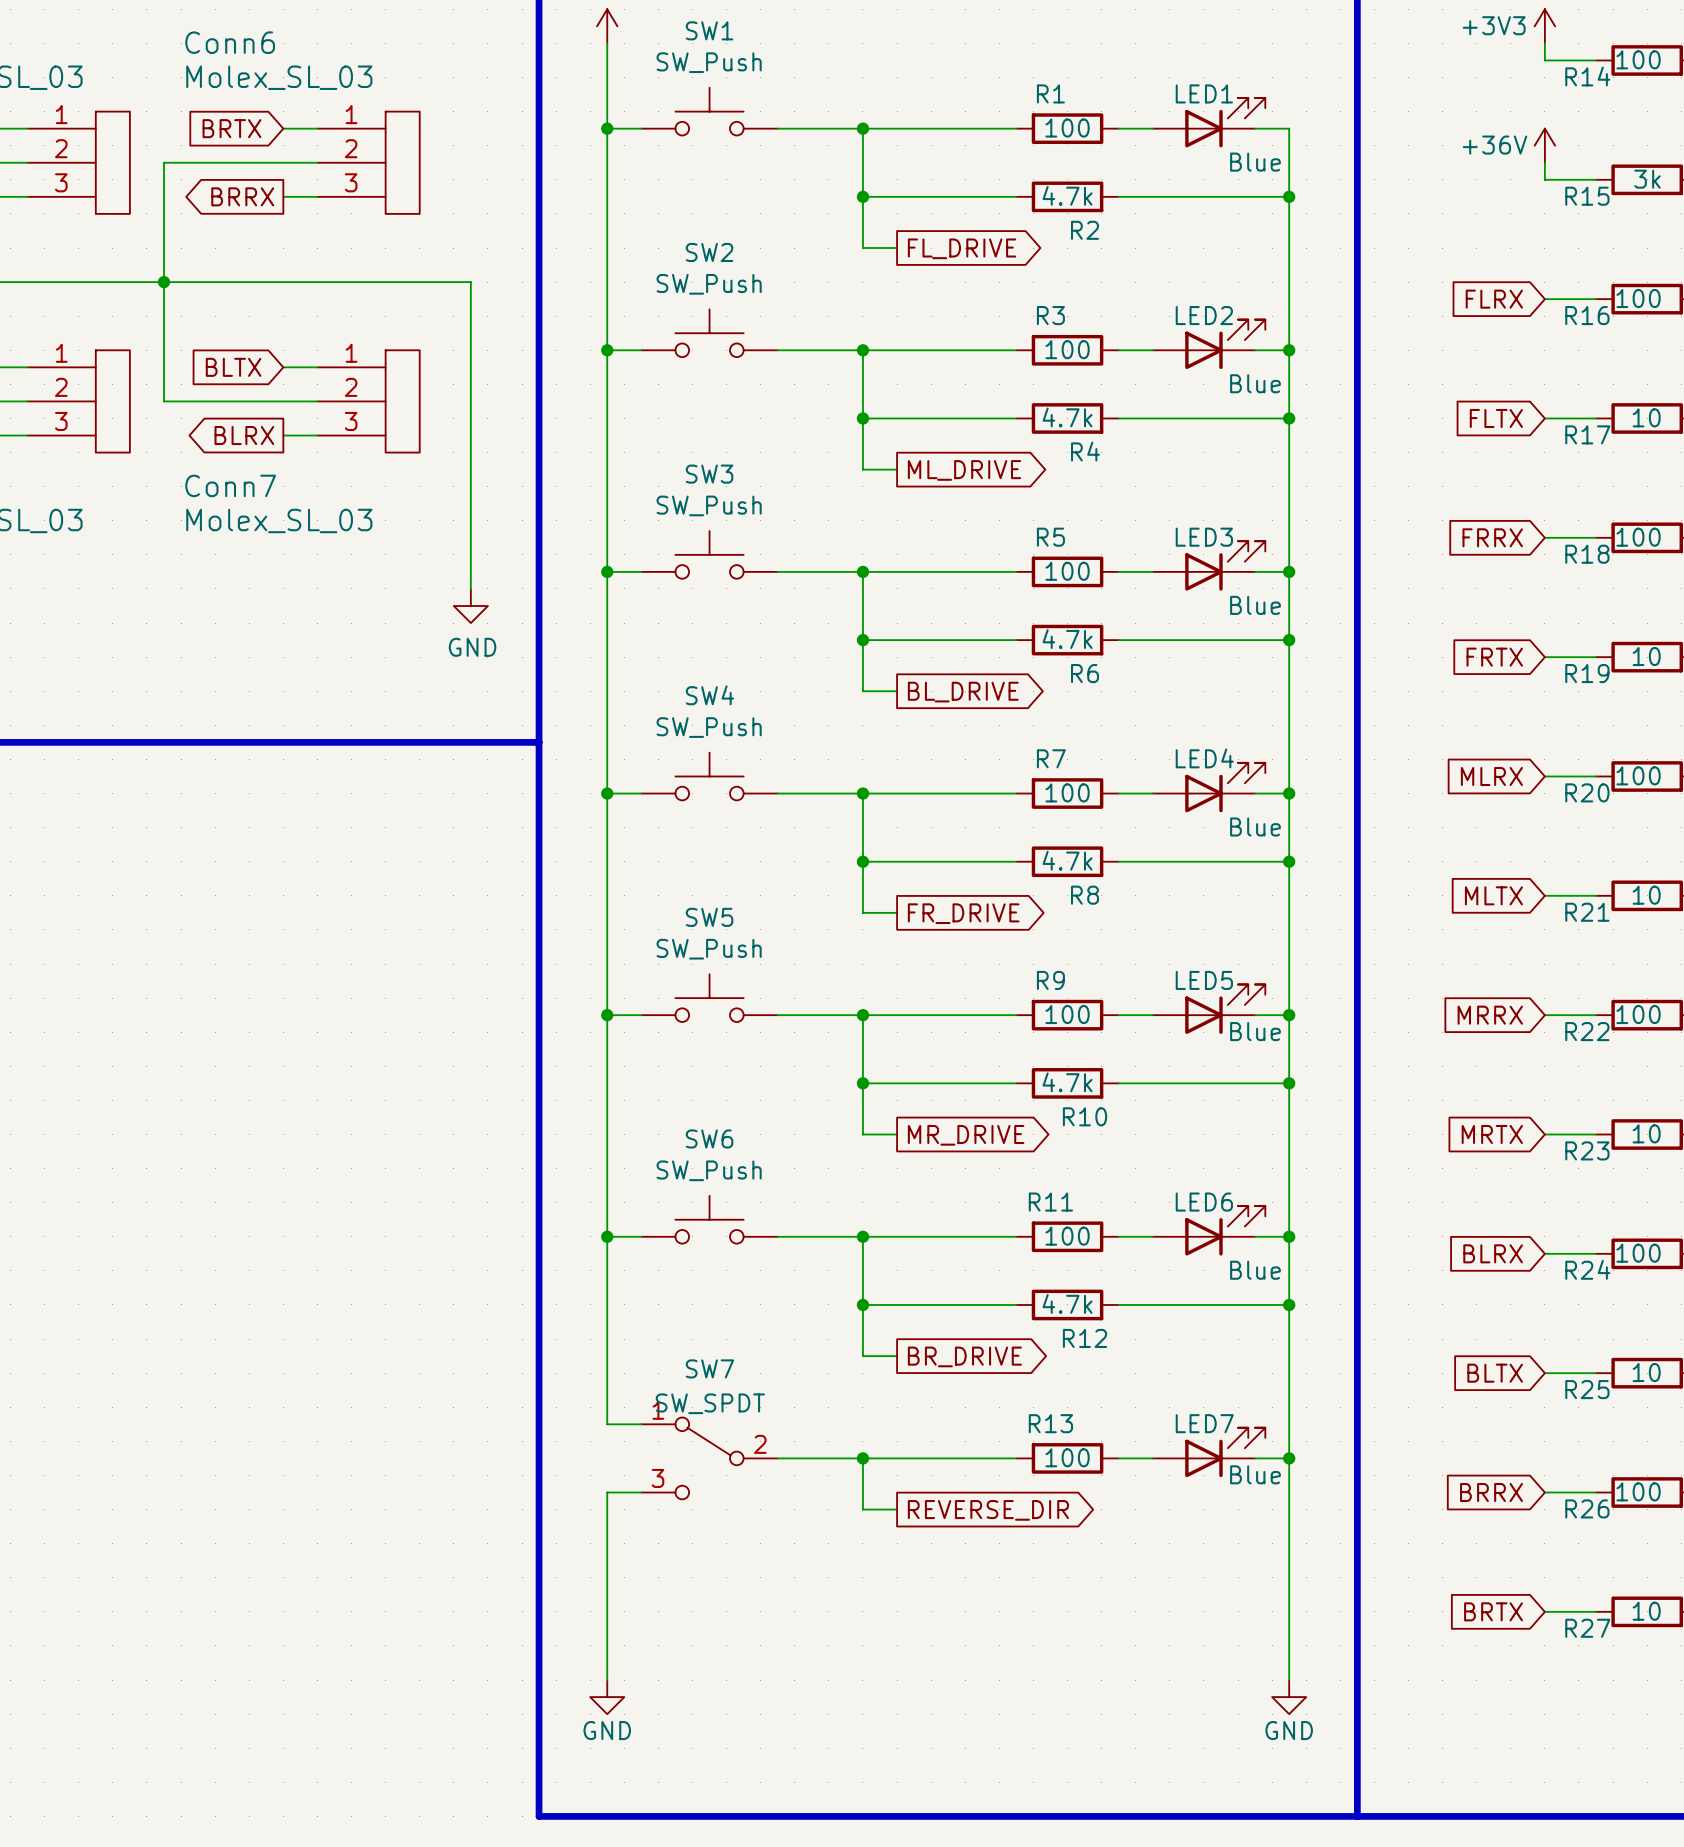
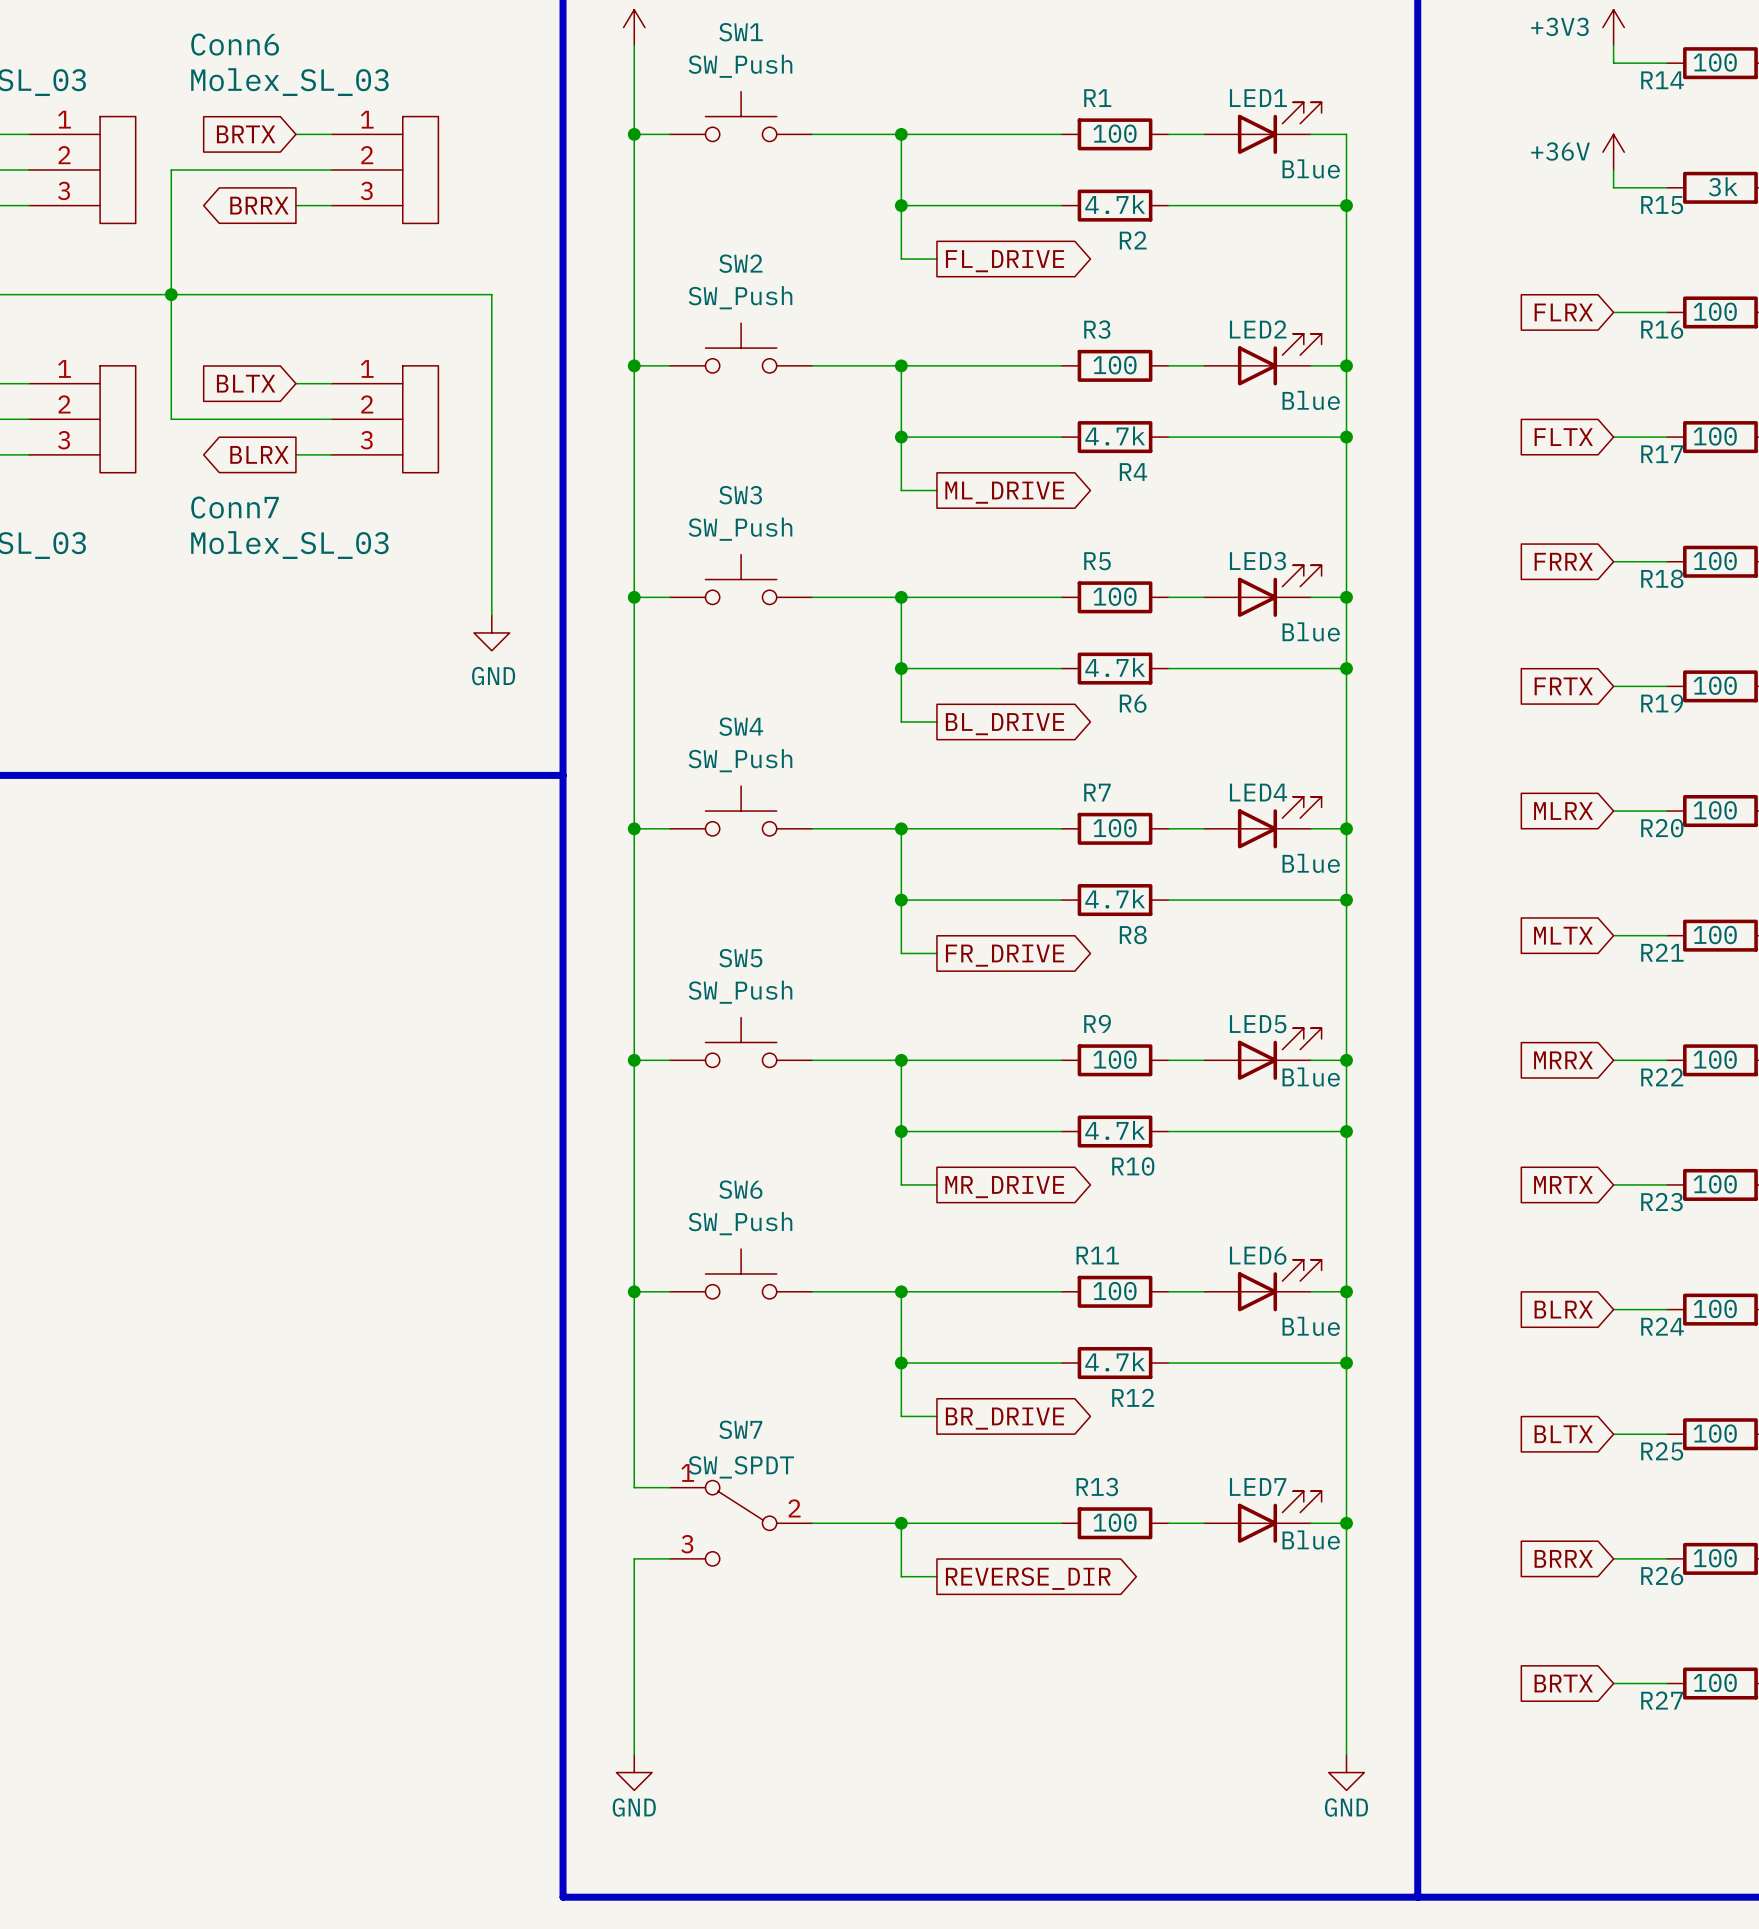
R17 value: 10 (1646, 417) -> 100 (1715, 436)
R19 value: 10 (1646, 656) -> 100 (1715, 685)
R21 value: 10 (1646, 895) -> 100 (1715, 935)
R23 value: 10 (1646, 1133) -> 100 (1715, 1184)
R25 value: 10 (1646, 1372) -> 100 (1715, 1433)
R27 value: 10 (1646, 1611) -> 100 (1715, 1682)

